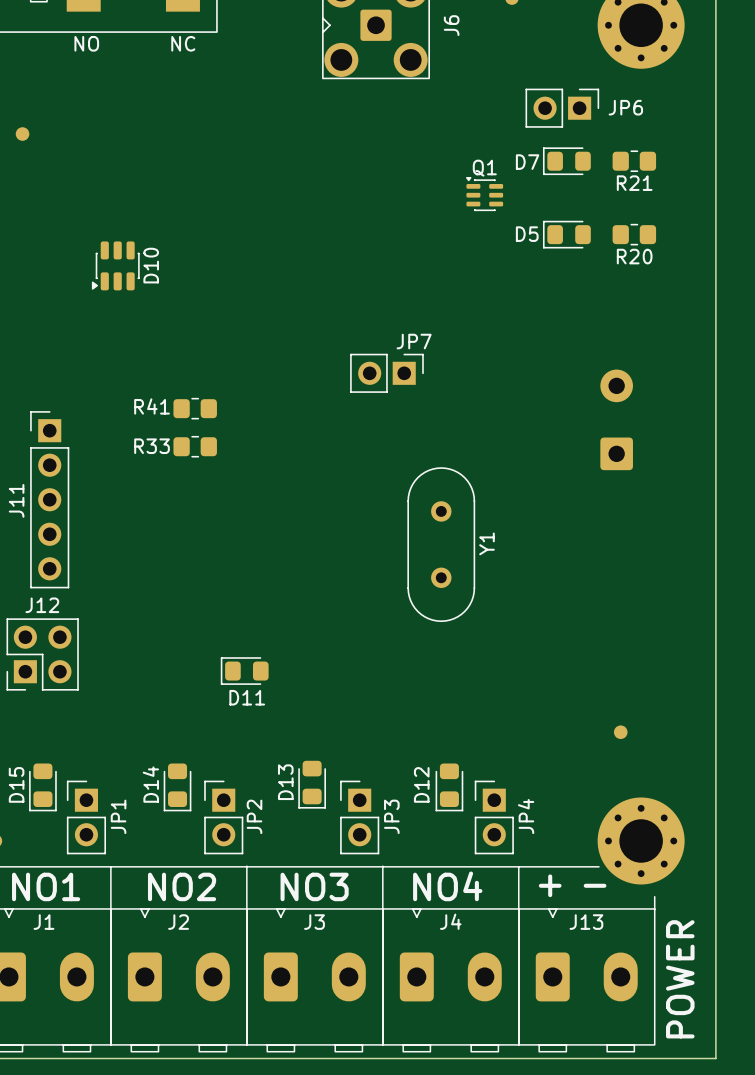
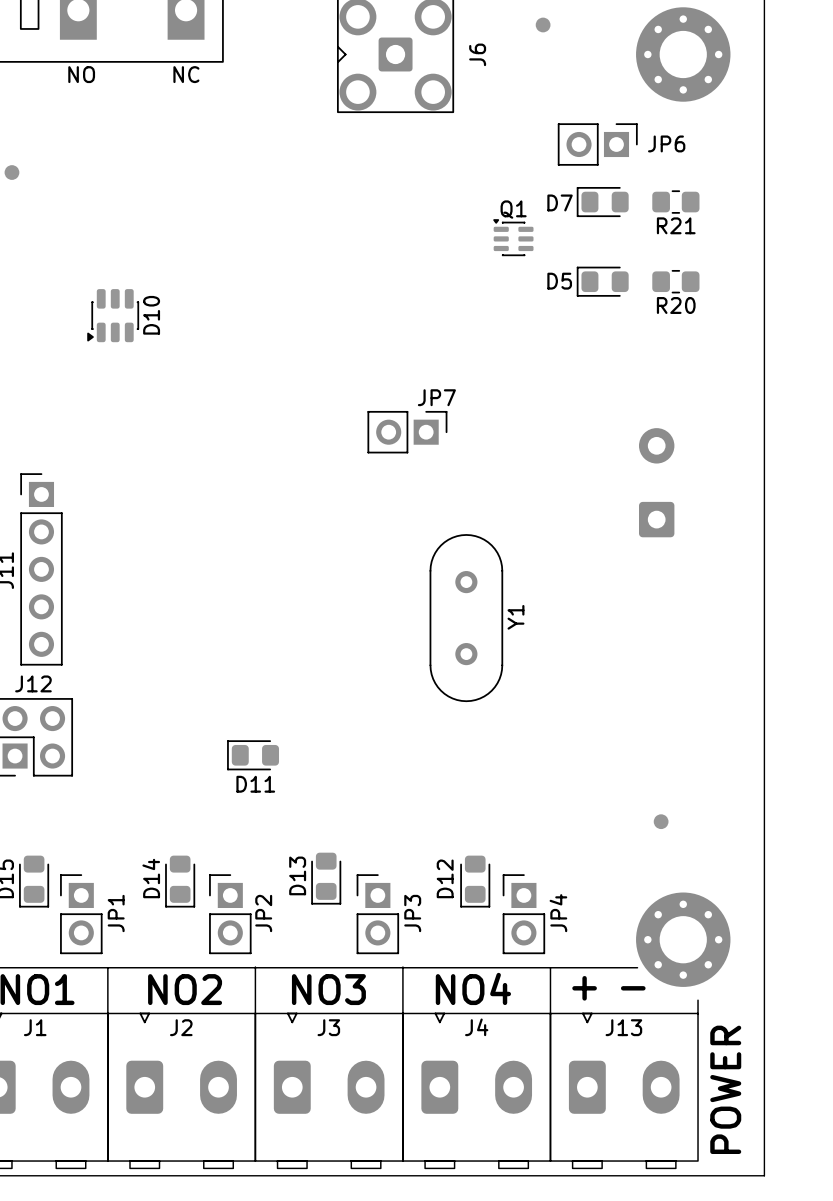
R41: (195, 408) -> none
R33: (195, 446) -> none

